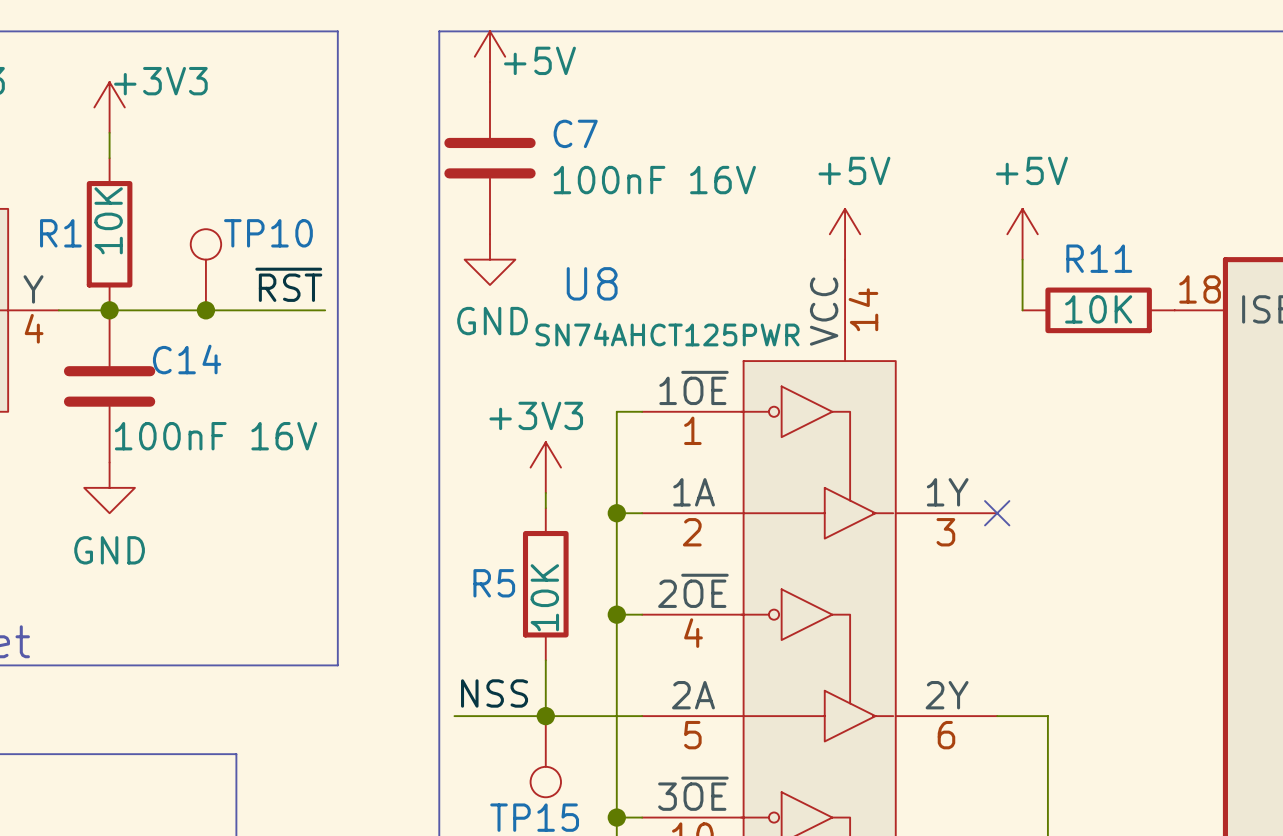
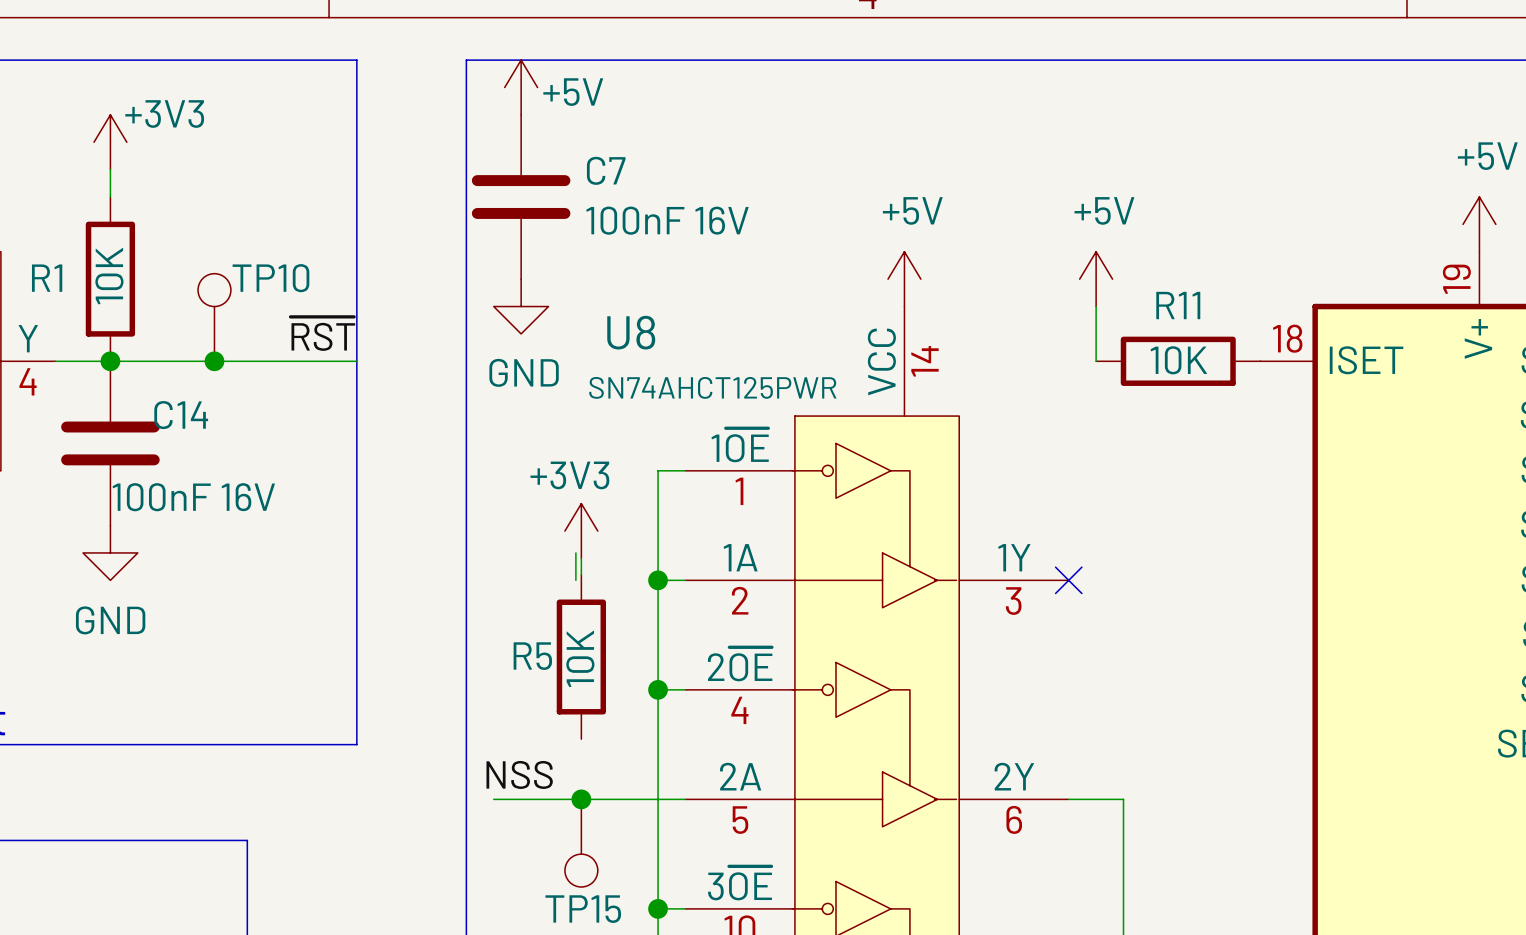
label position: ~{RST} (288, 284) -> ~{RST} (322, 333)
wire: none -> (343, 361) (356, 361)
wire: none -> (575, 552) (575, 580)
wire: (545, 660) (545, 716) -> none
wire: (454, 716) (464, 716) -> none

